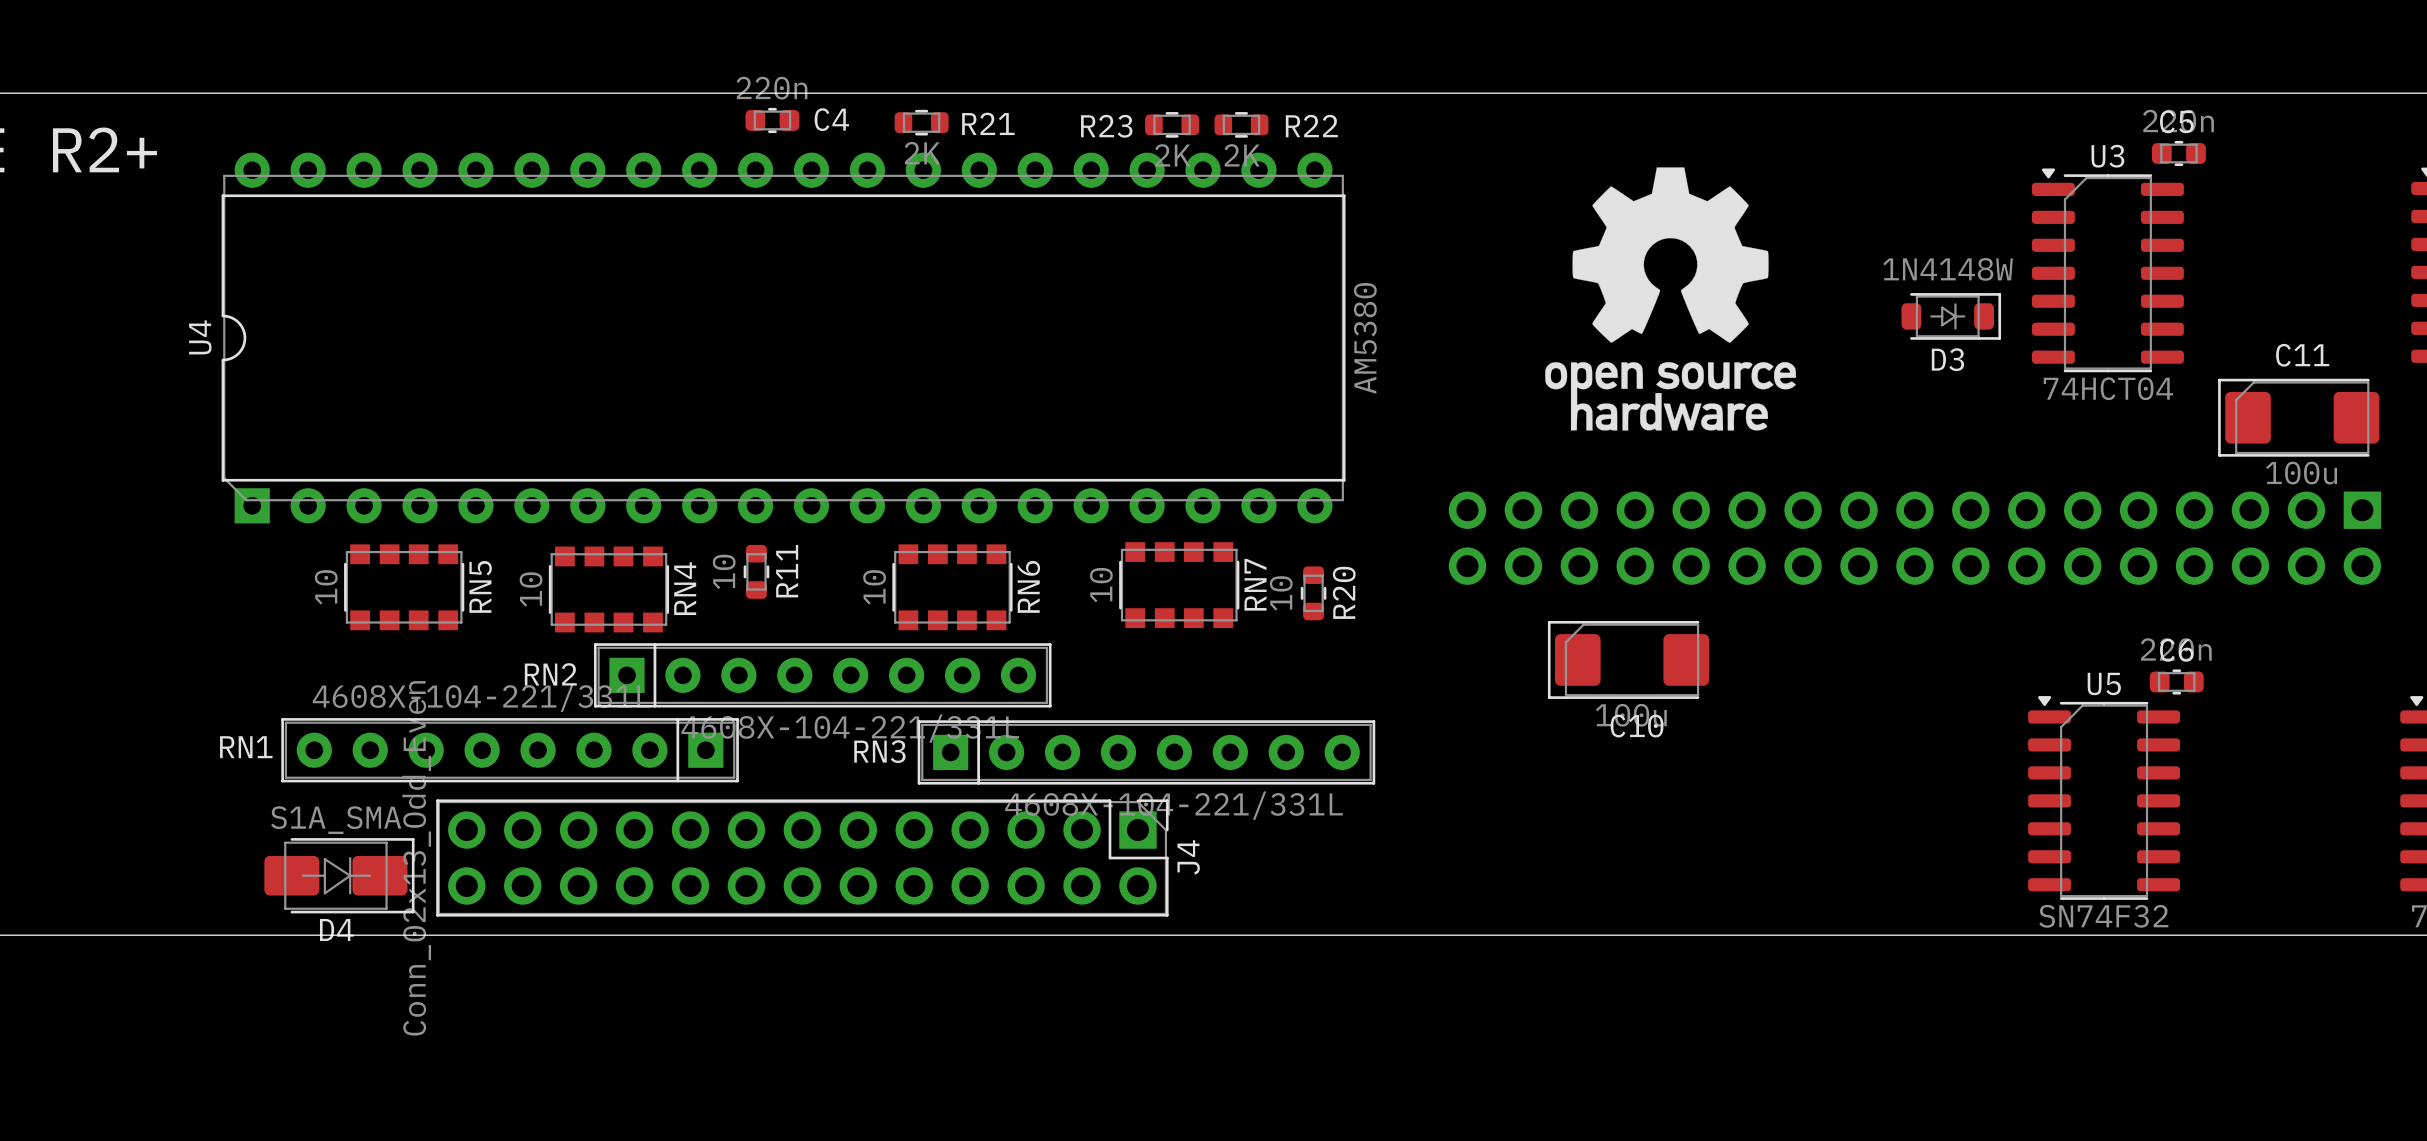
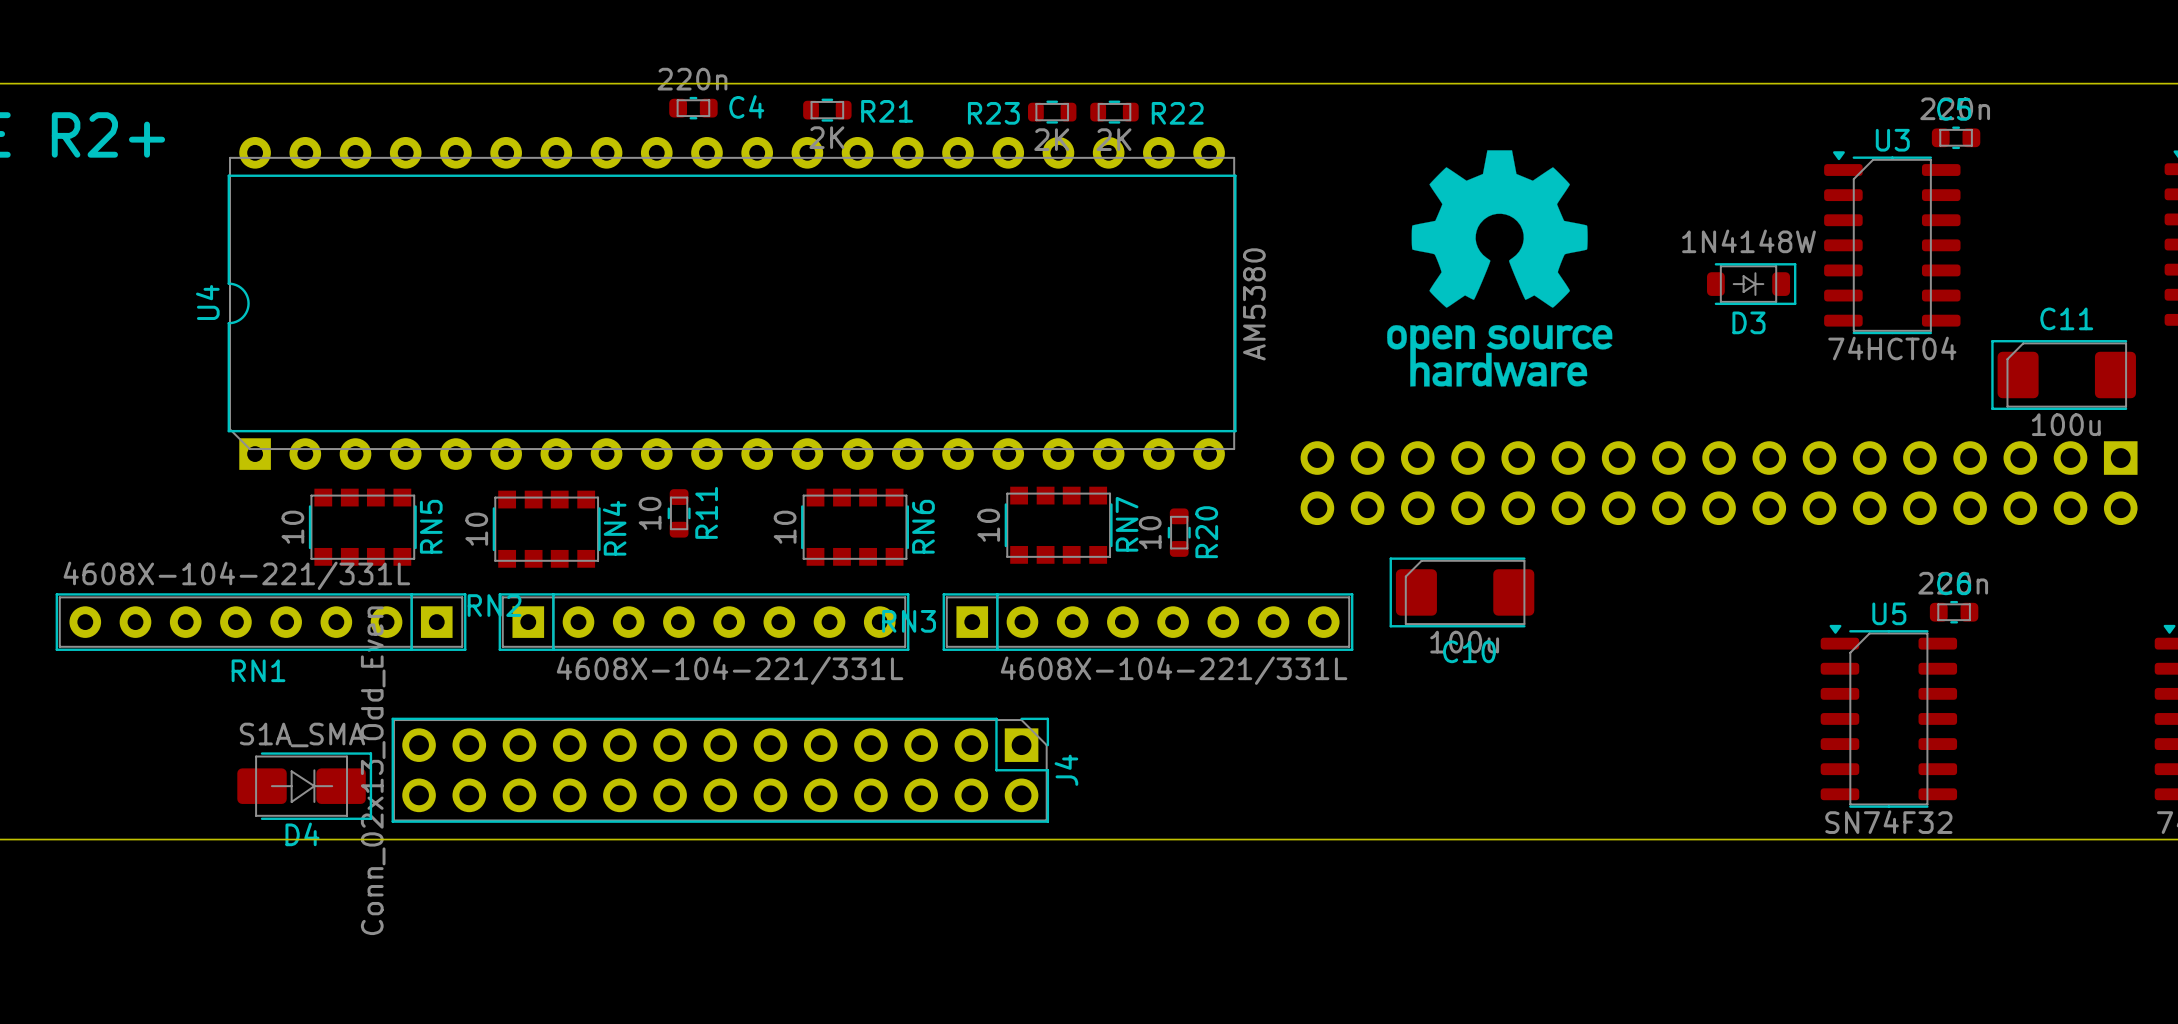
U4 position: (783, 338) -> (732, 303)
RN2 position: (822, 675) -> (704, 622)
RN1 name position: RN1 (246, 747) -> RN1 (258, 670)
RN1 position: (510, 750) -> (261, 622)
RN3 position: (1146, 752) -> (1147, 622)

